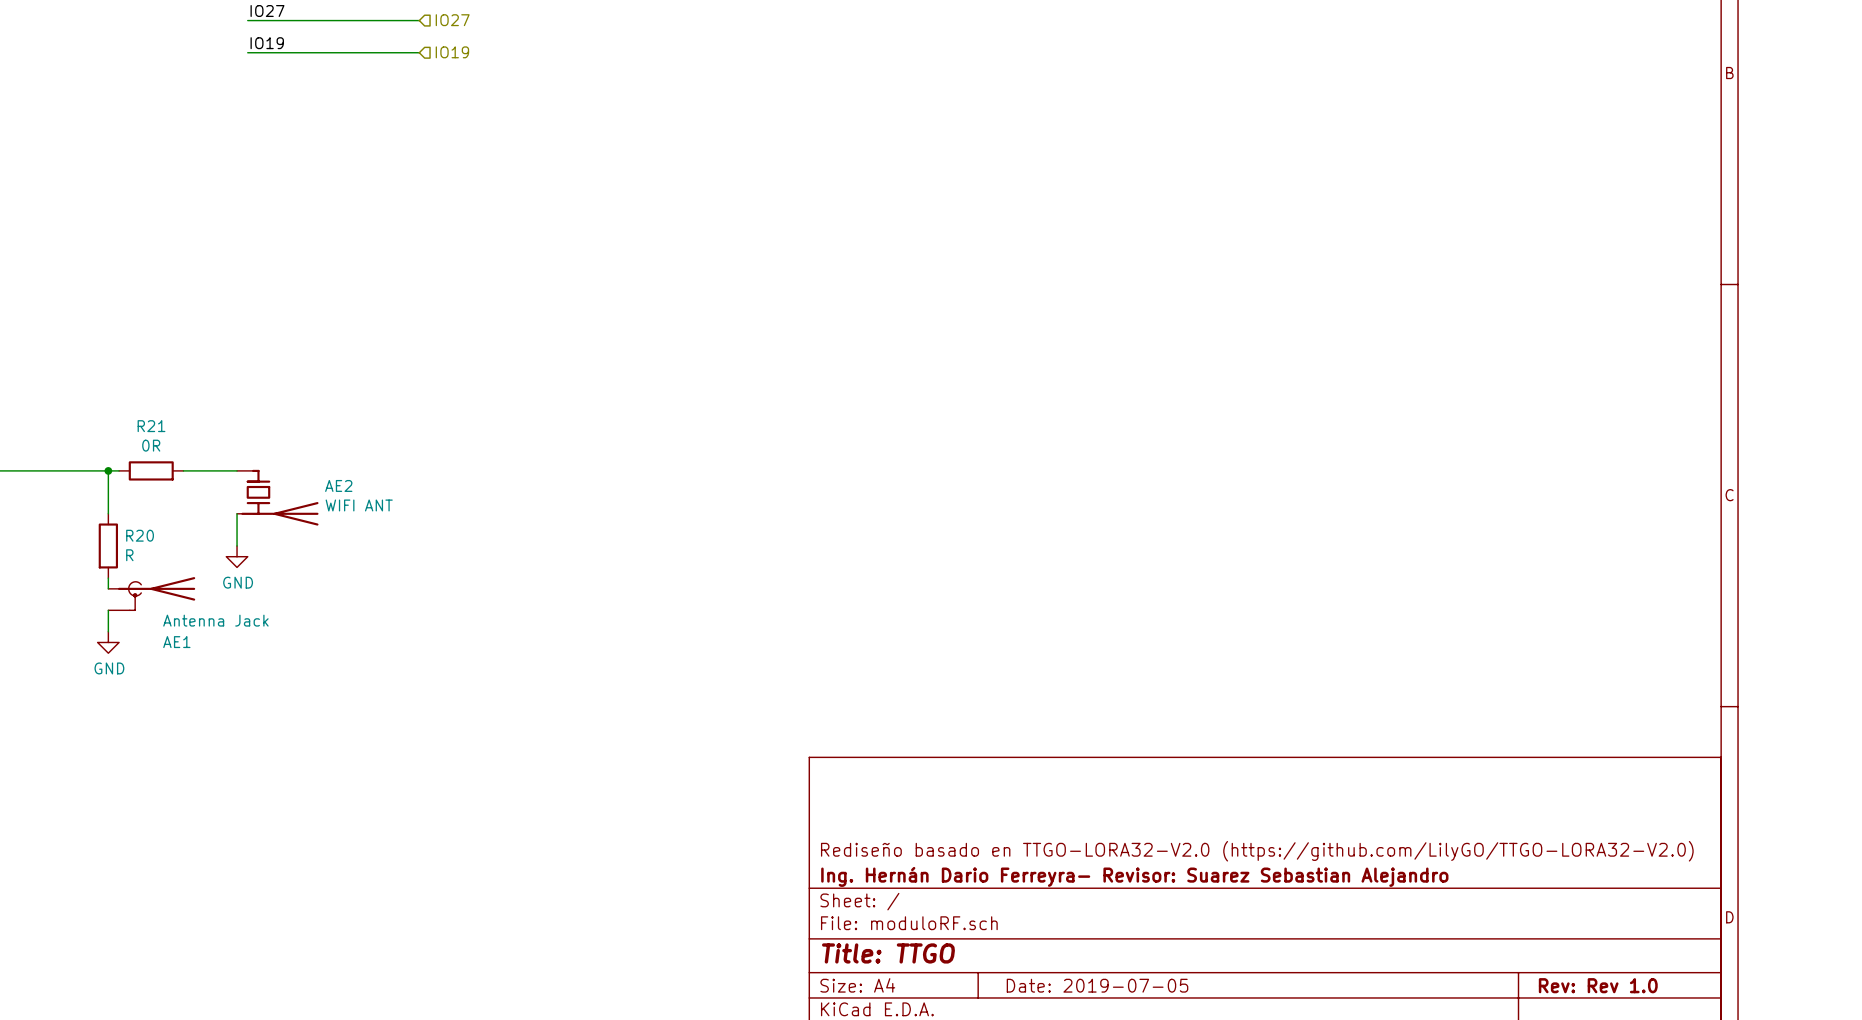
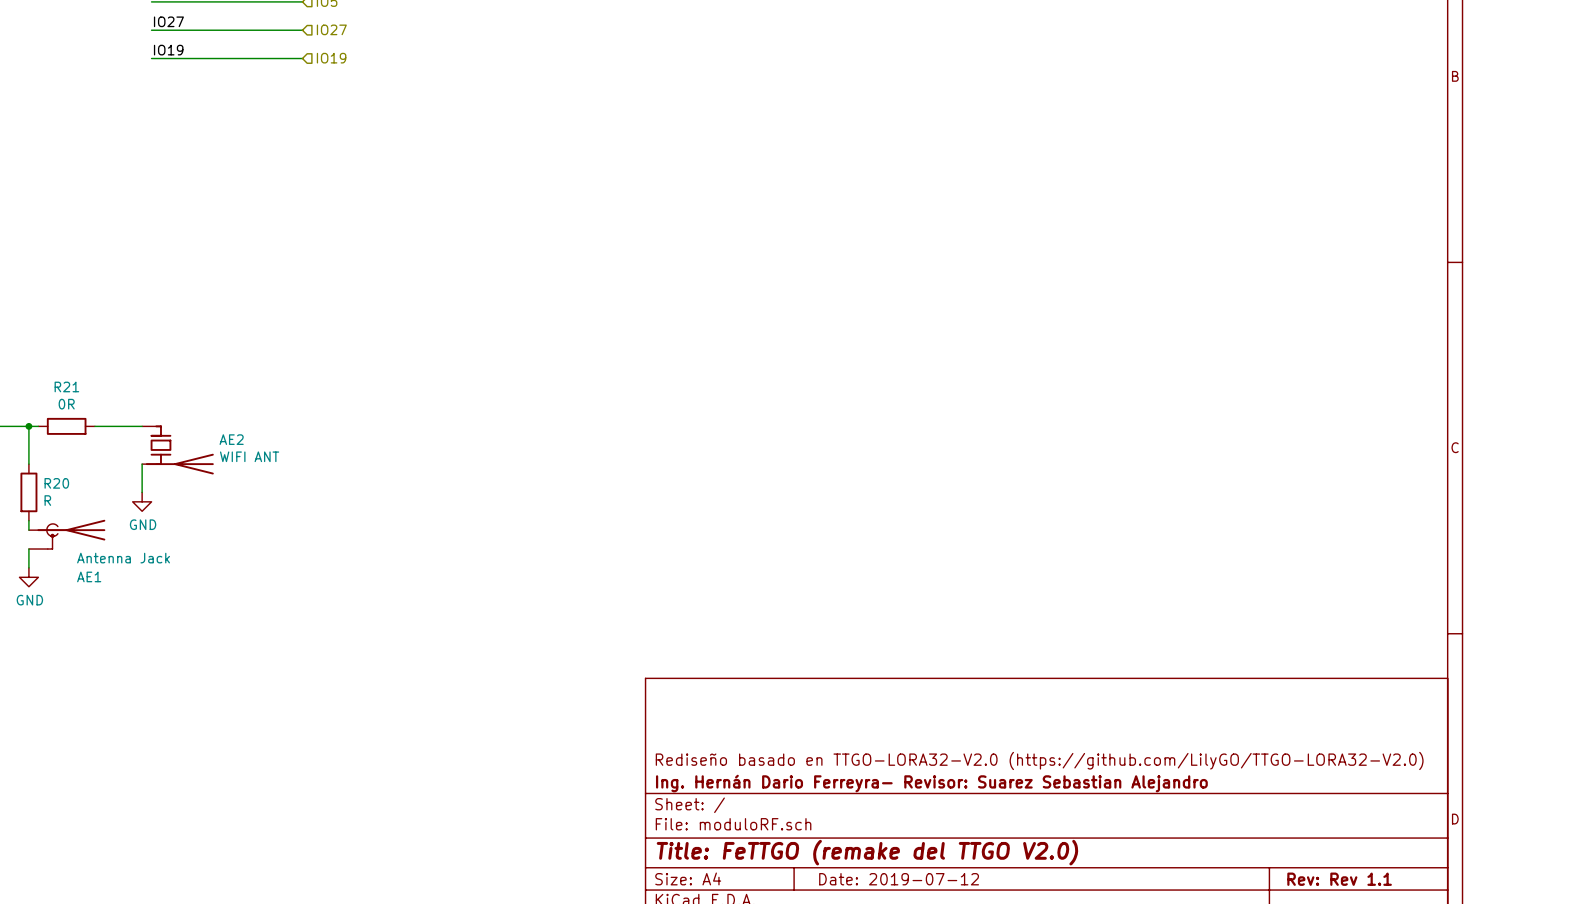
title block: Title: TTGO (888, 953) -> Title: FeTTGO (remake del TTGO V2.0) (867, 852)
title block: Date: 2019-07-05 (1097, 985) -> Date: 2019-07-12 (899, 879)
title block: Rev: Rev 1.0 (1598, 985) -> Rev: Rev 1.1 (1339, 879)

